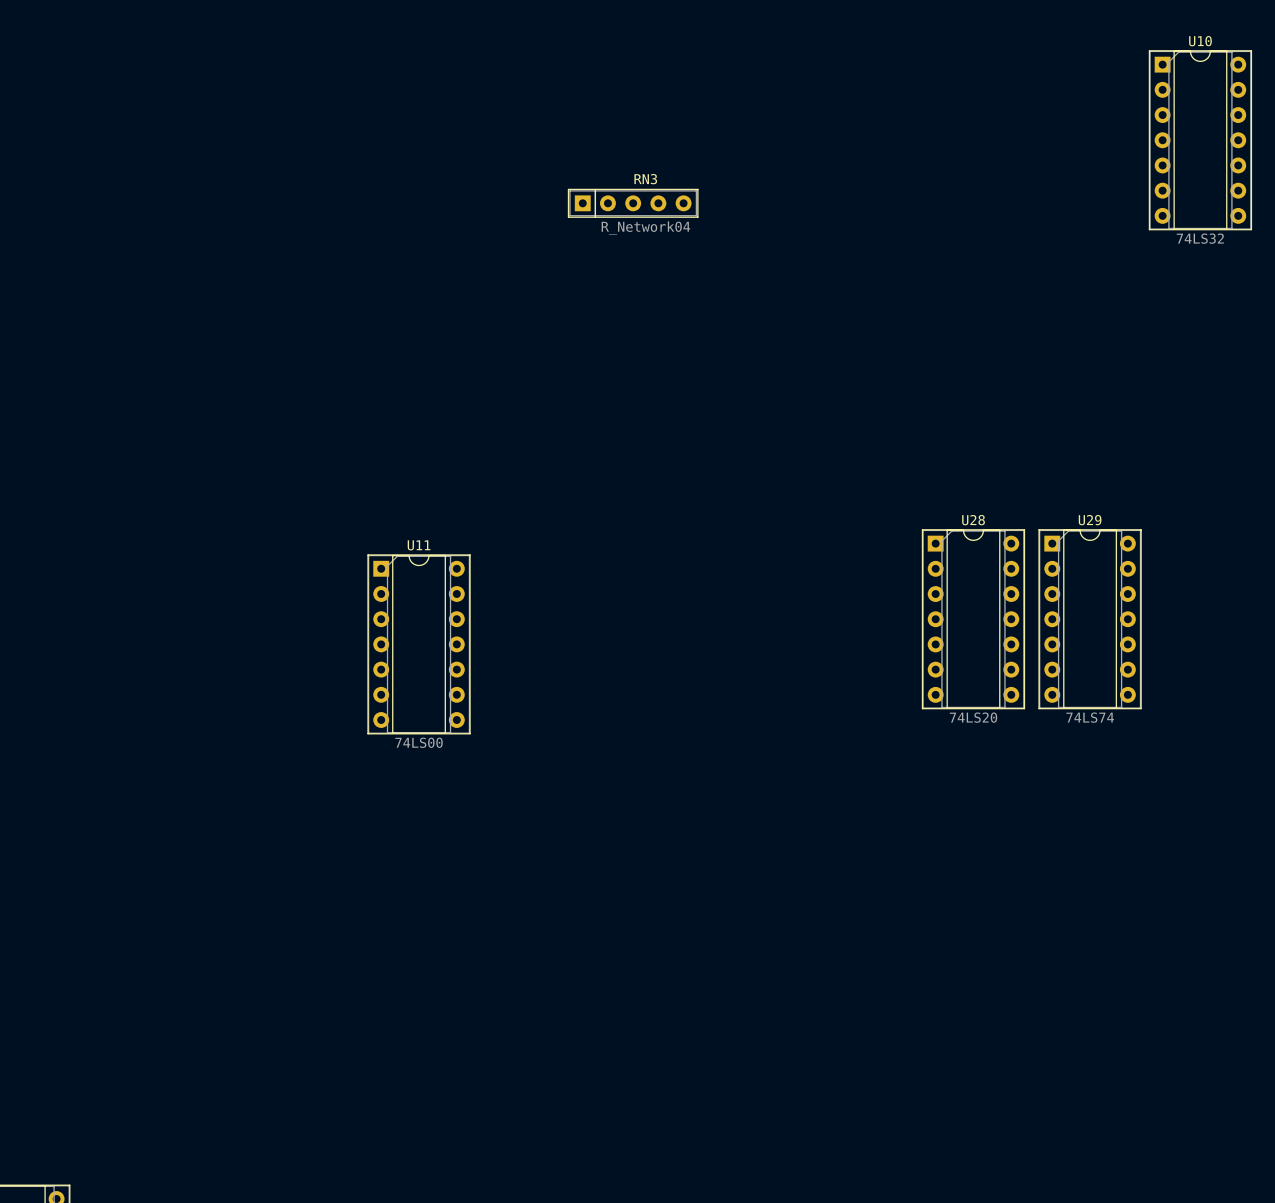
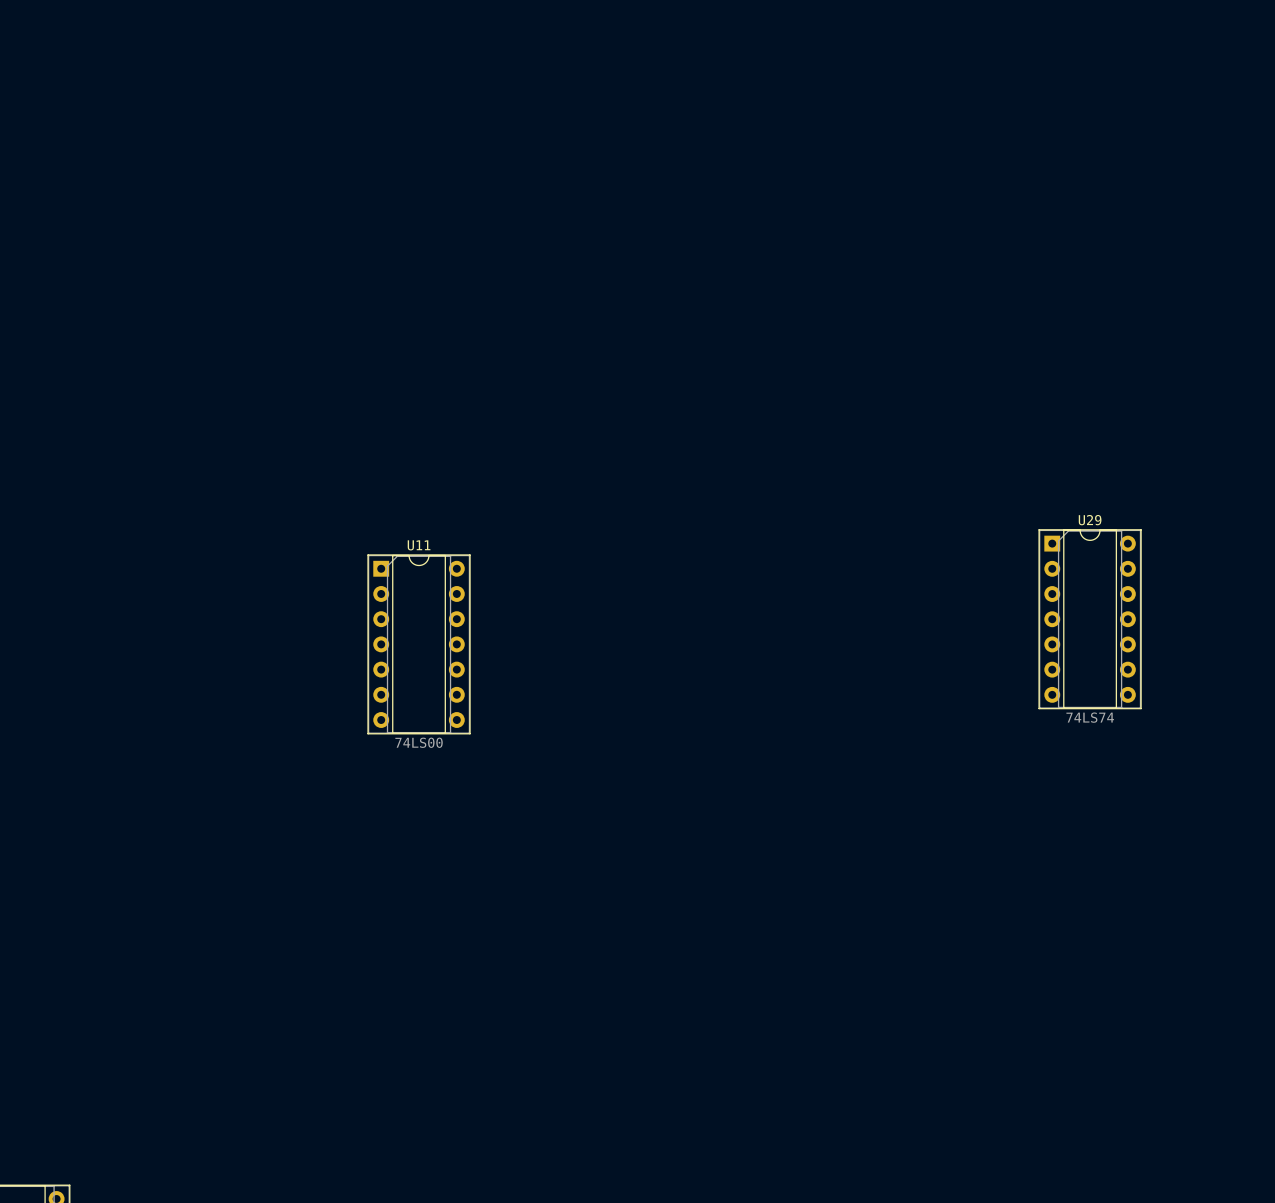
U10: 74LS32 (1200, 140) -> none
RN3: R_Network04 (633, 203) -> none
U28: 74LS20 (973, 619) -> none

